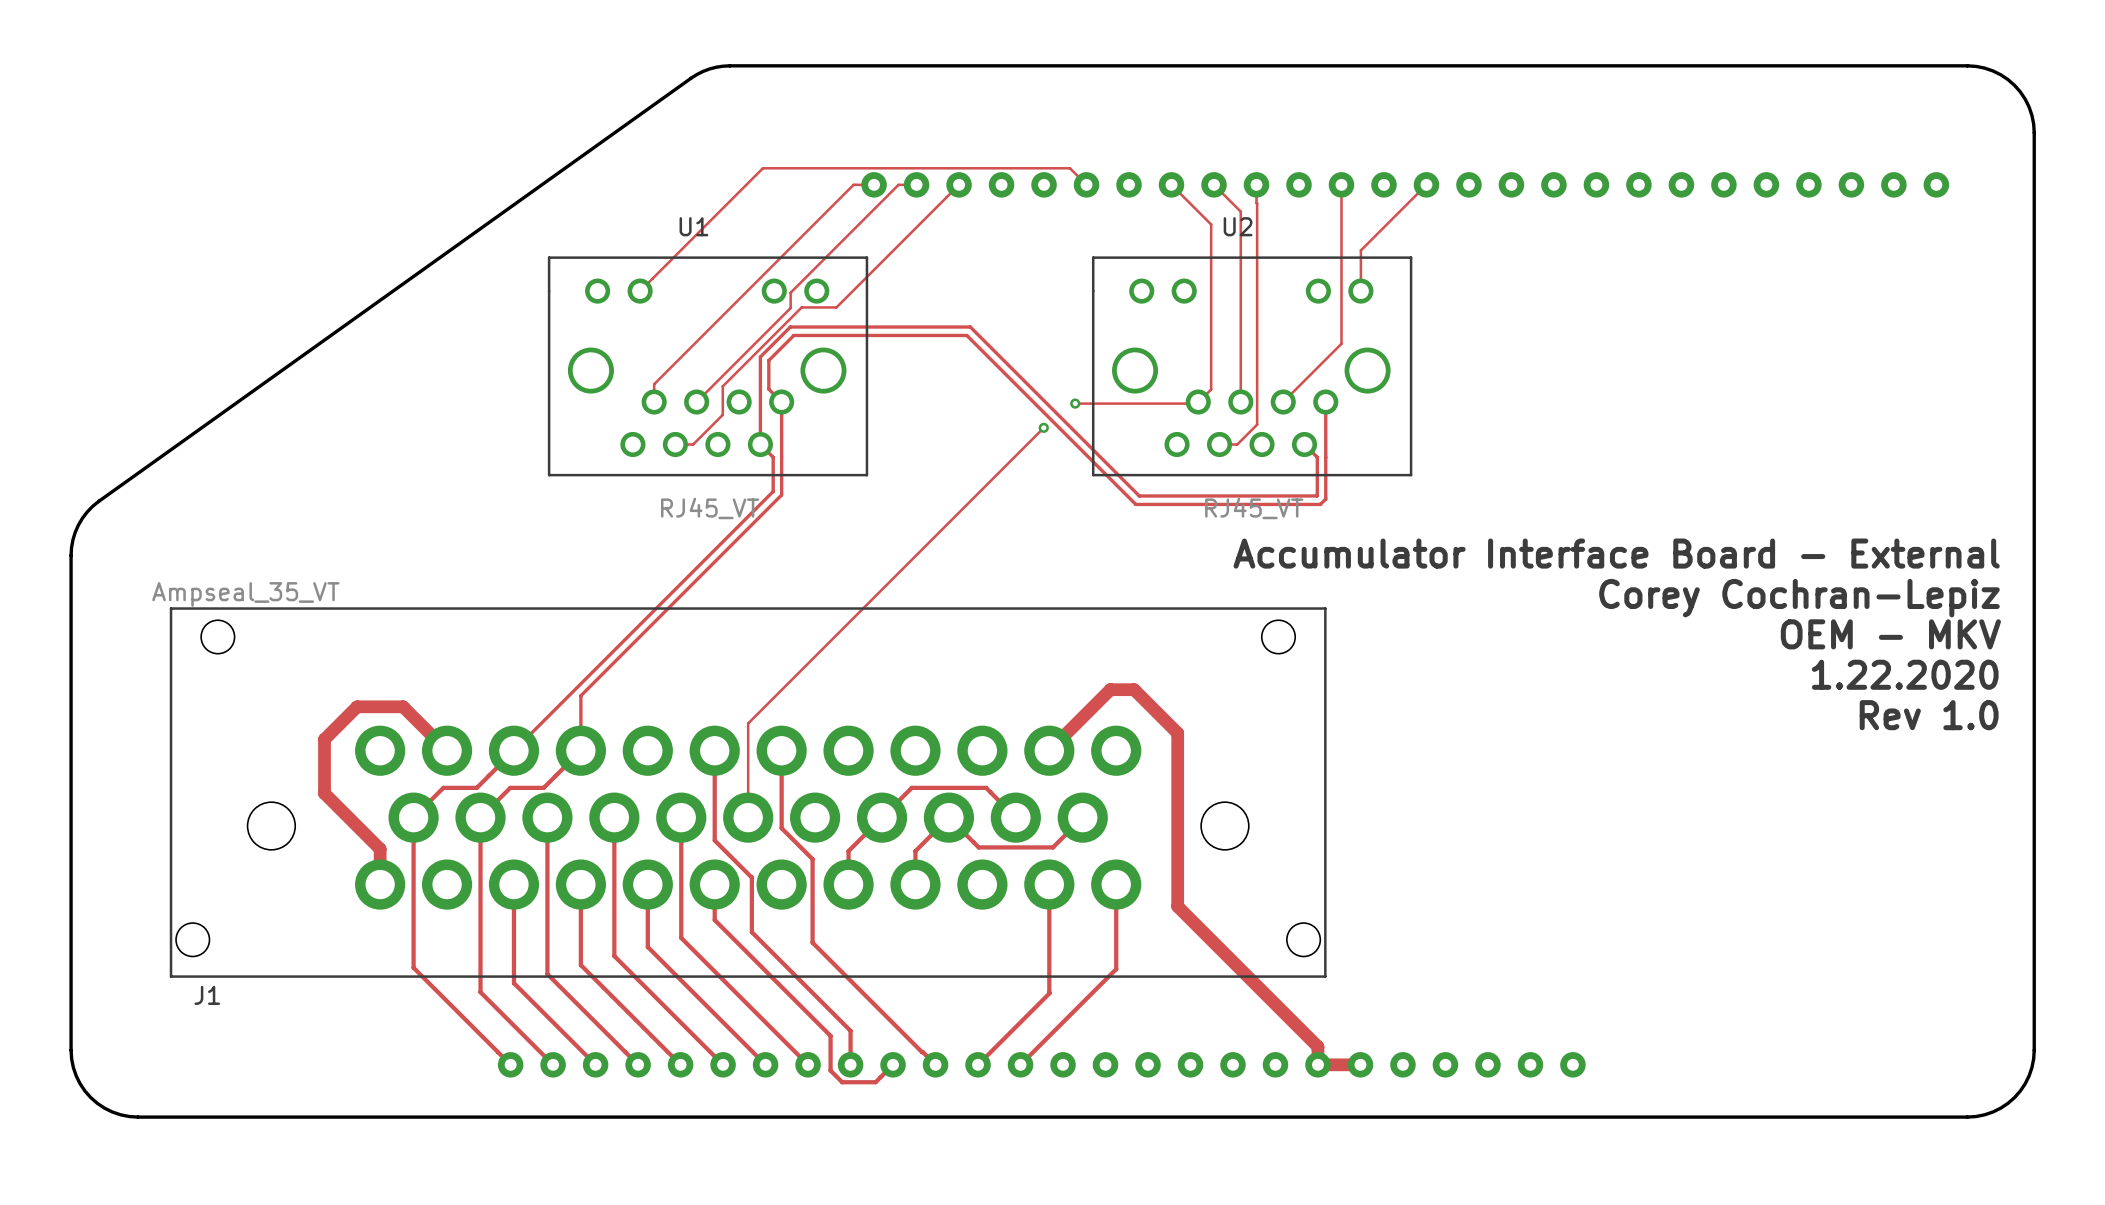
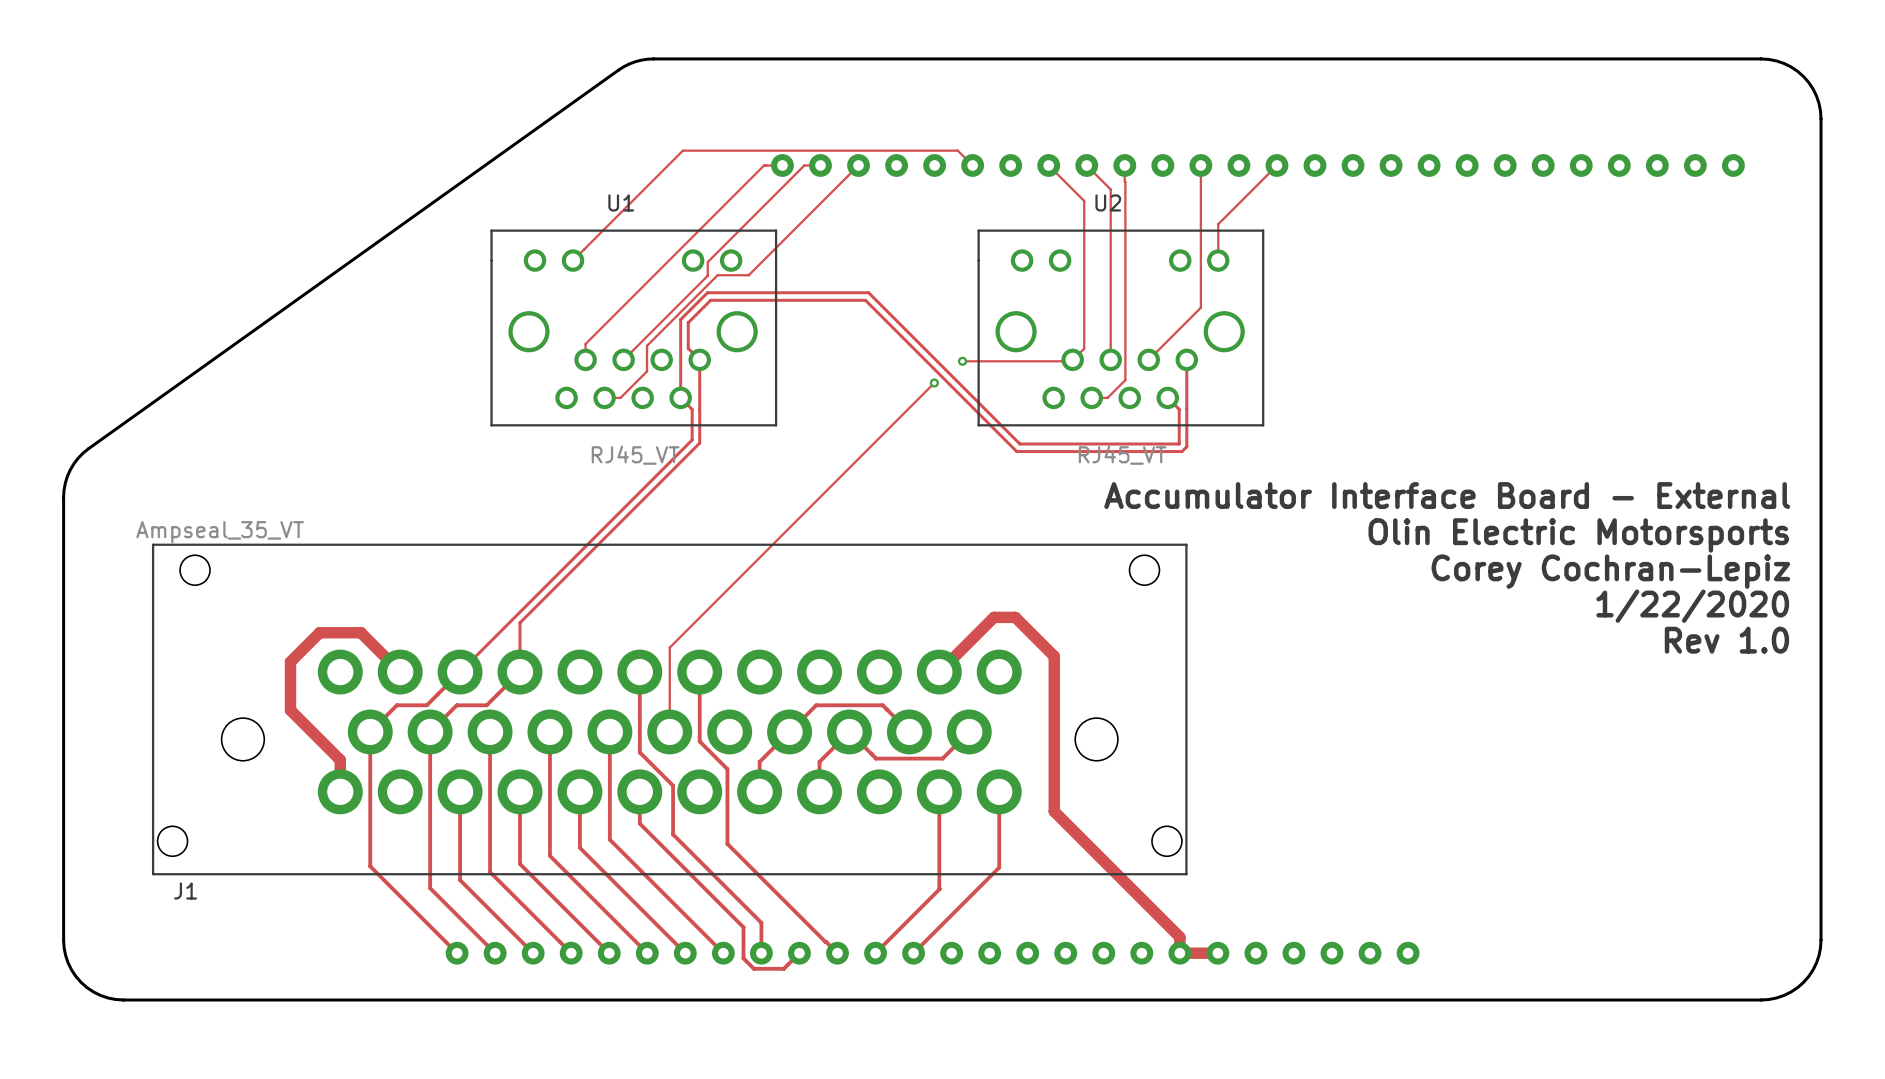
text: Corey Cochran-Lepiz (1799, 598) -> Olin Electric Motorsports (1578, 535)
text: OEM - MKV (1890, 634) -> Corey Cochran-Lepiz (1610, 571)
text: 1.22.2020 (1905, 674) -> 1/22/2020 (1692, 606)

